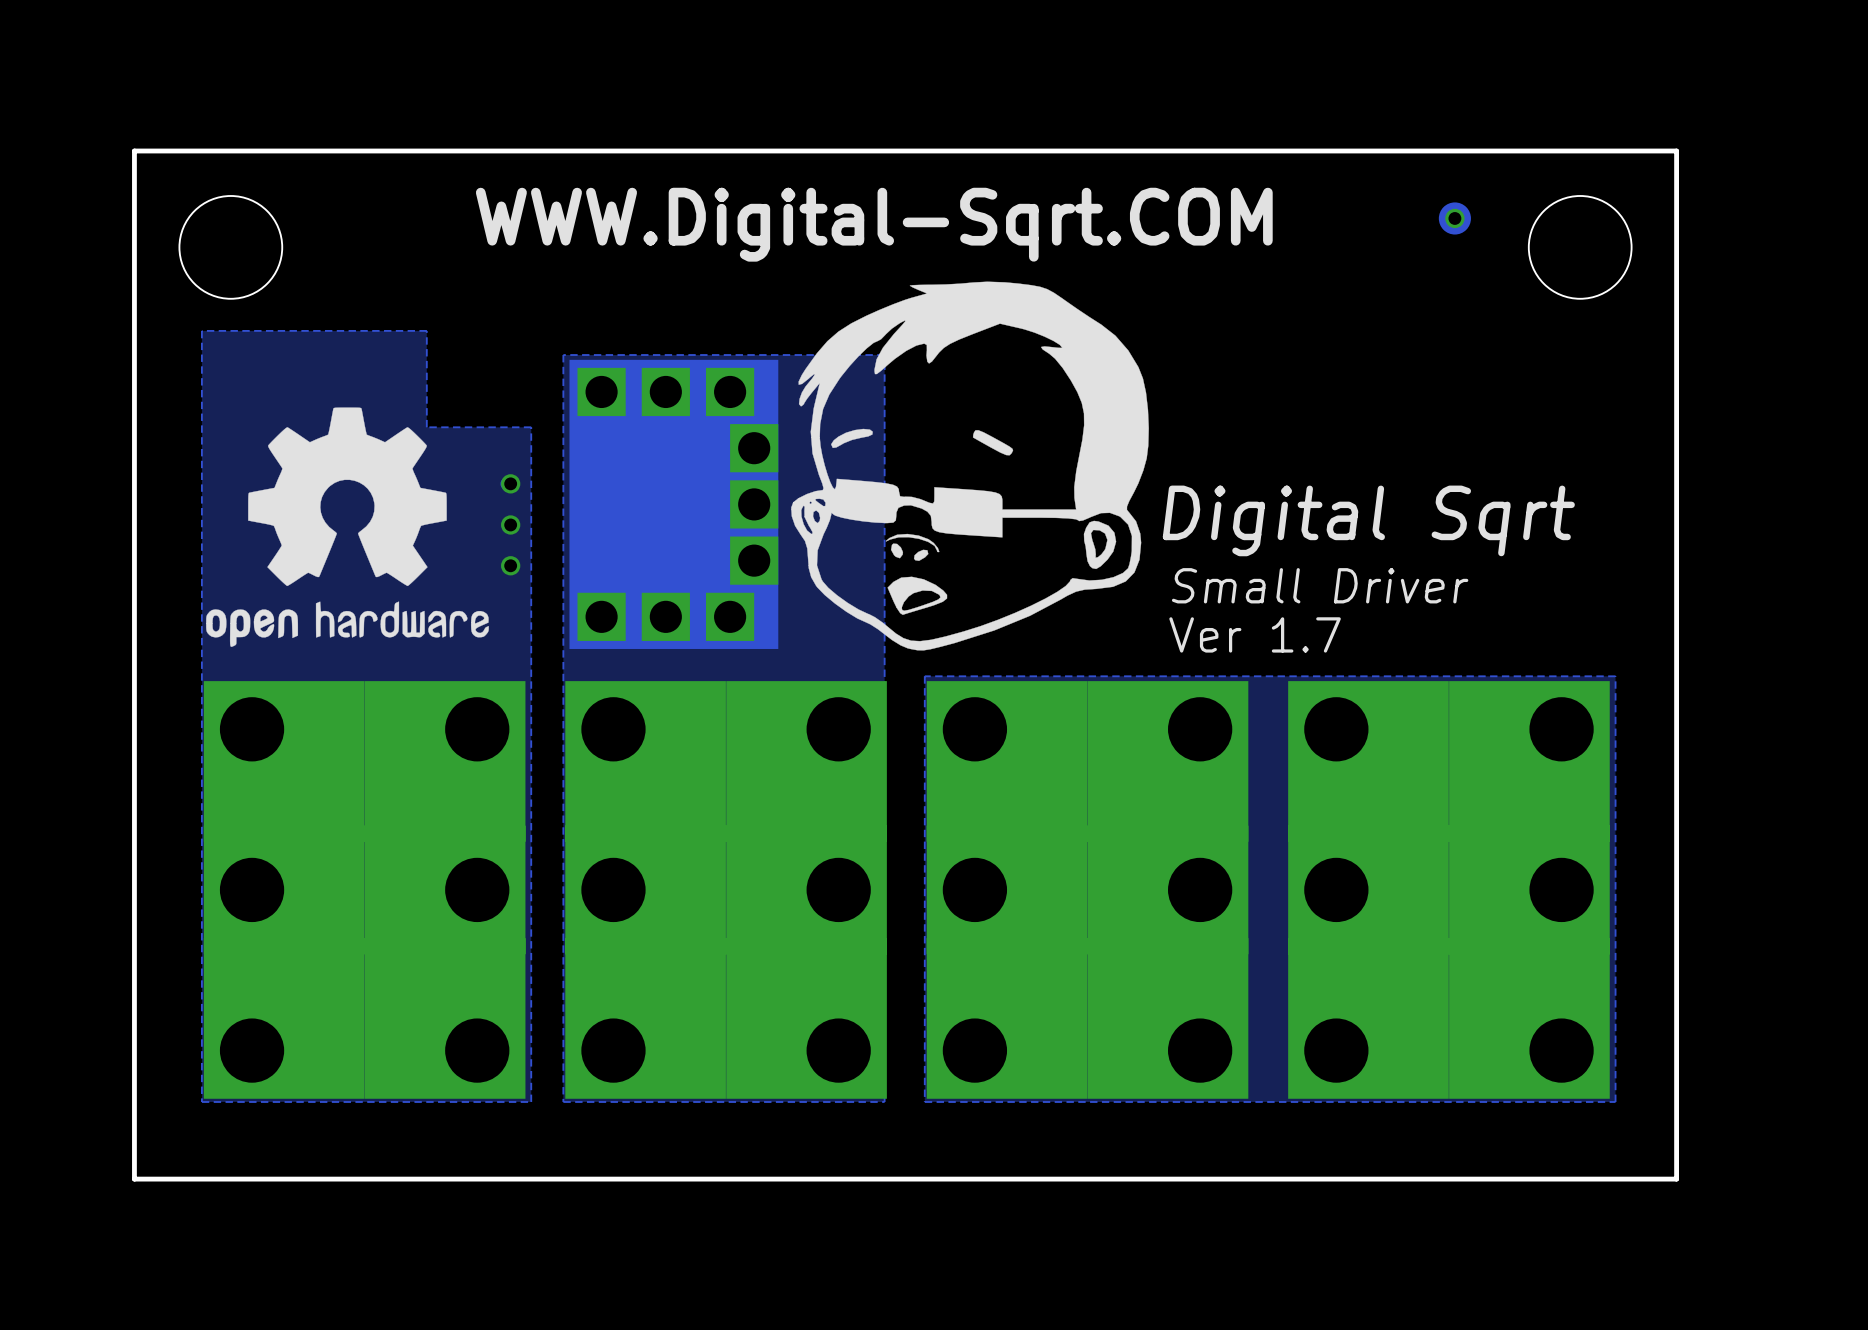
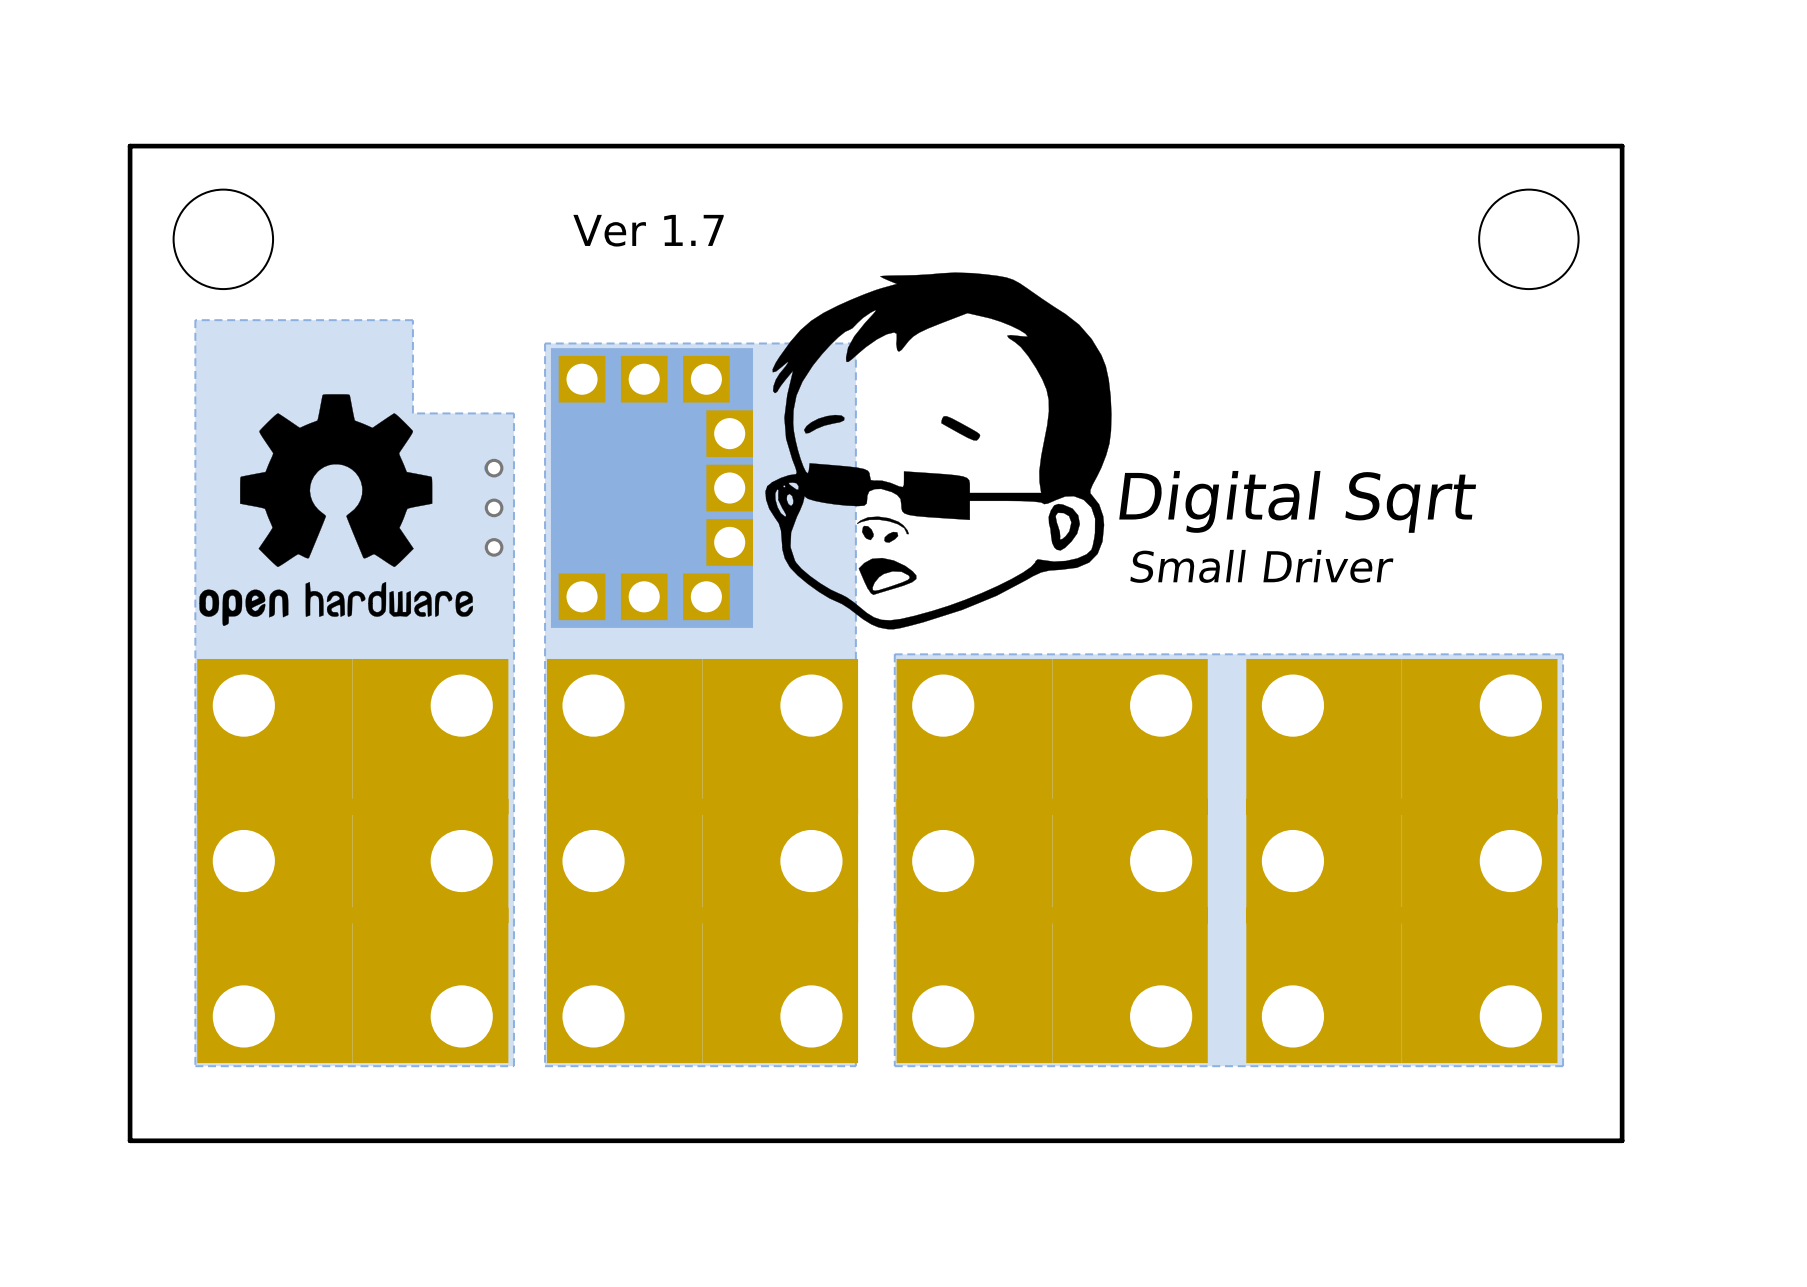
part: (1454, 218) -> none
via: (1454, 218) -> none
text: WWW.Digital-Sqrt.COM (874, 224) -> none
text position: Ver 1.7 (1255, 634) -> Ver 1.7 (648, 230)

